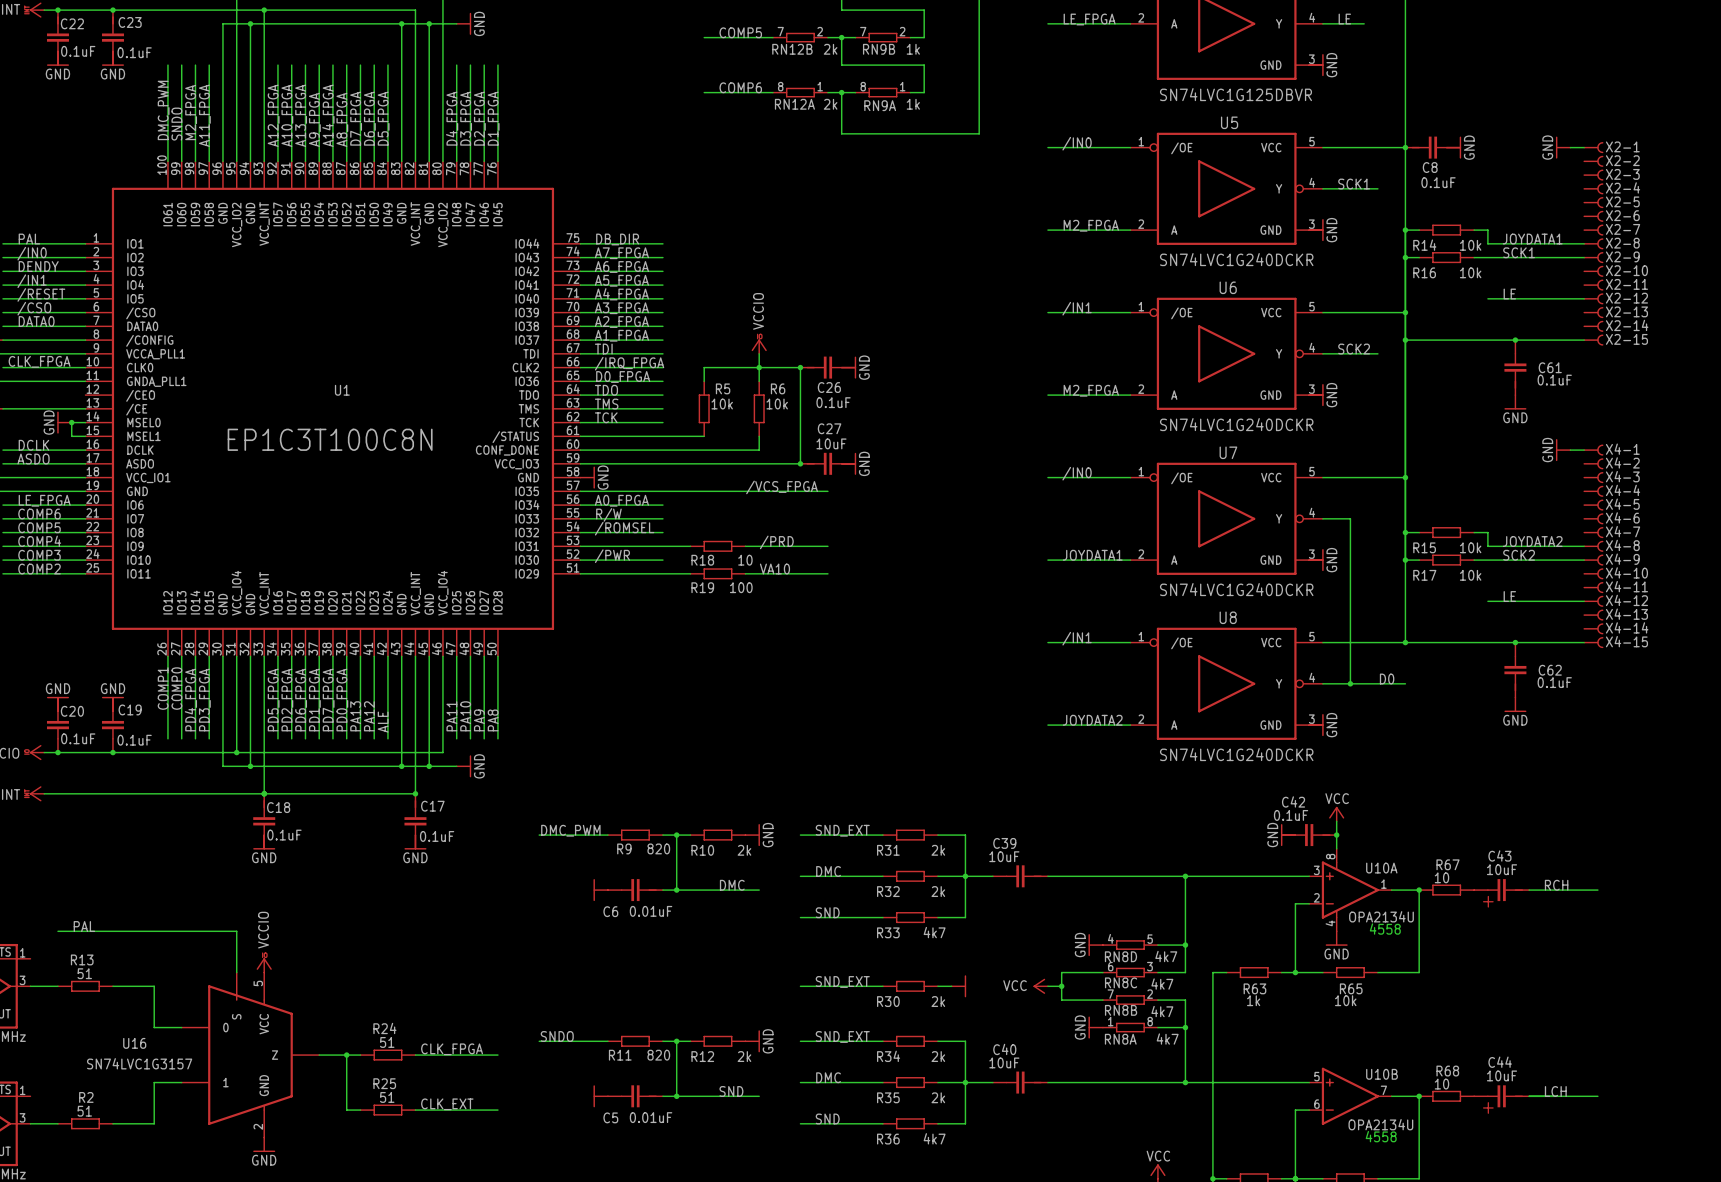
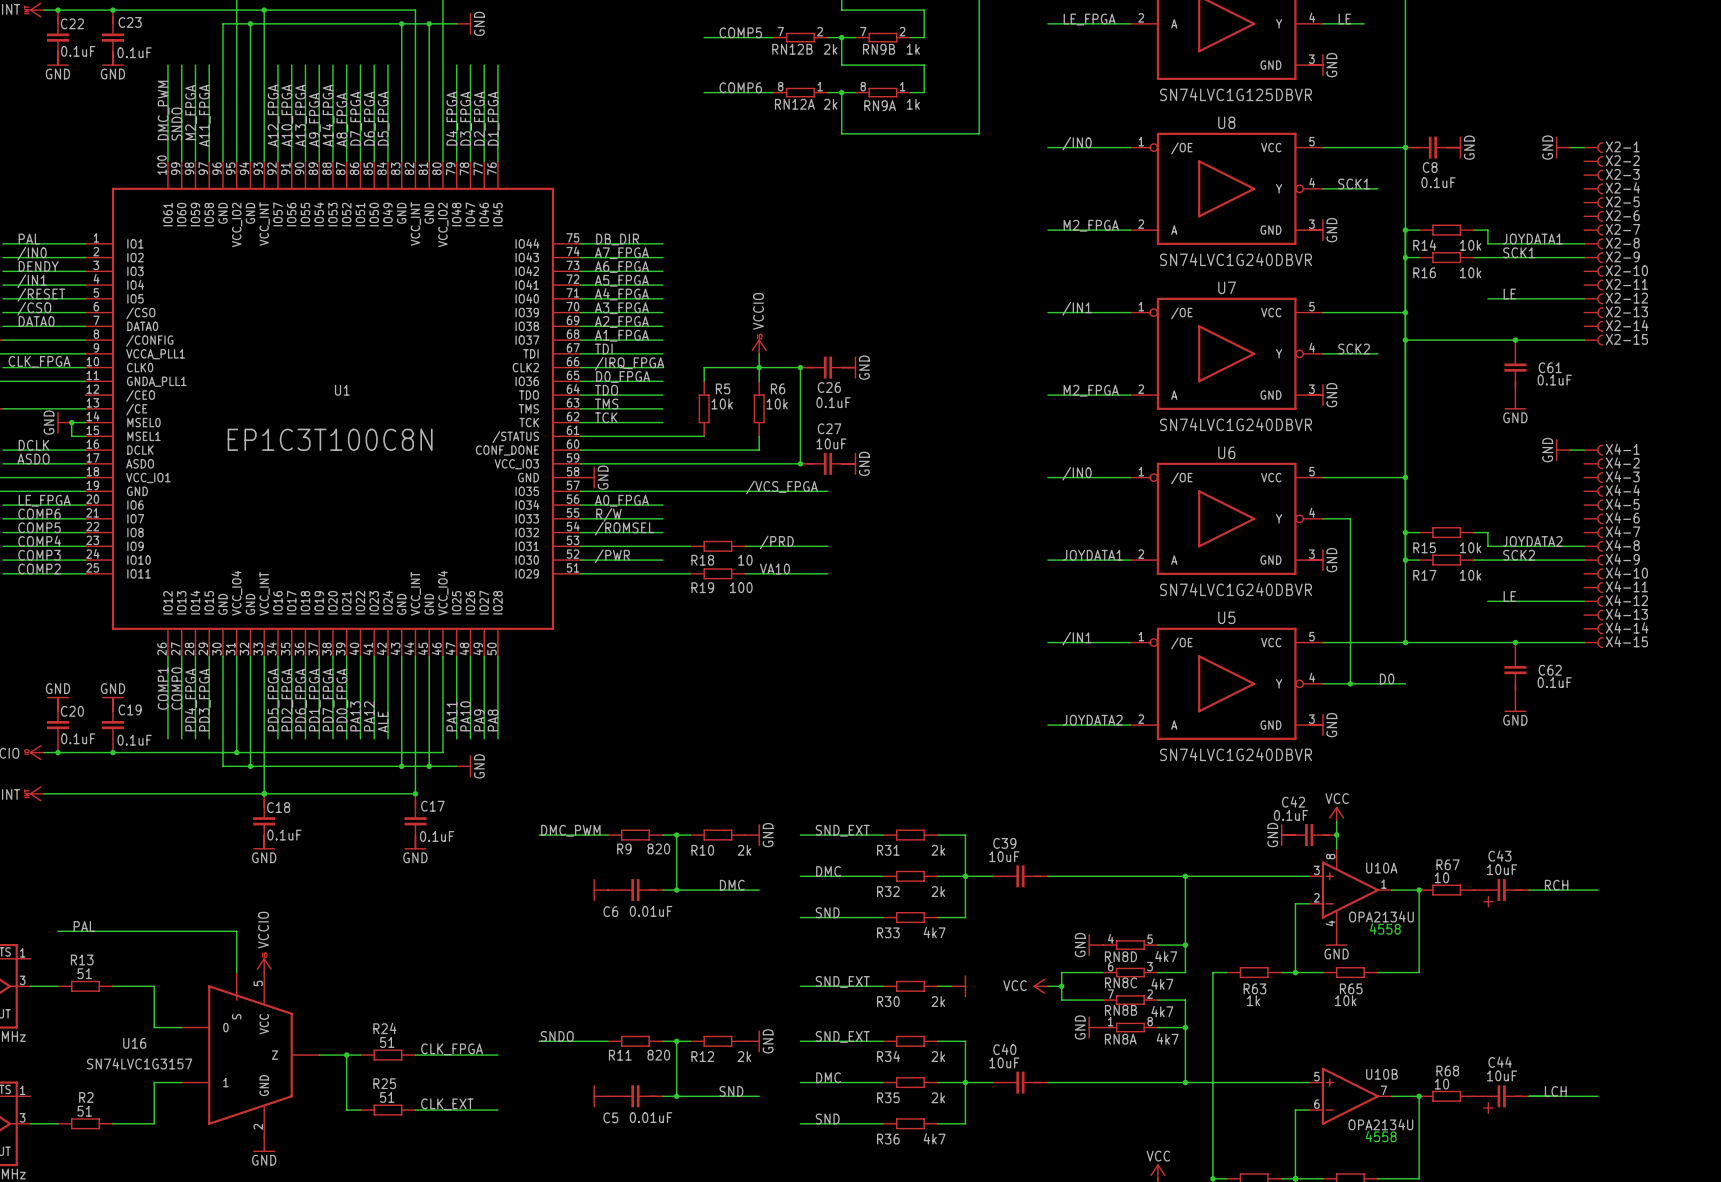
U5 name: U5 (1229, 122) -> U8 (1226, 122)
U5 value: SN74LVC1G240DCKR (1236, 259) -> SN74LVC1G240DBVR (1235, 259)
U6 name: U6 (1228, 287) -> U7 (1227, 287)
U6 value: SN74LVC1G240DCKR (1236, 424) -> SN74LVC1G240DBVR (1235, 424)
U7 name: U7 (1228, 452) -> U6 (1226, 452)
U7 value: SN74LVC1G240DCKR (1236, 589) -> SN74LVC1G240DBVR (1235, 589)
U8 name: U8 (1228, 617) -> U5 (1226, 617)
U8 value: SN74LVC1G240DCKR (1236, 754) -> SN74LVC1G240DBVR (1235, 754)

